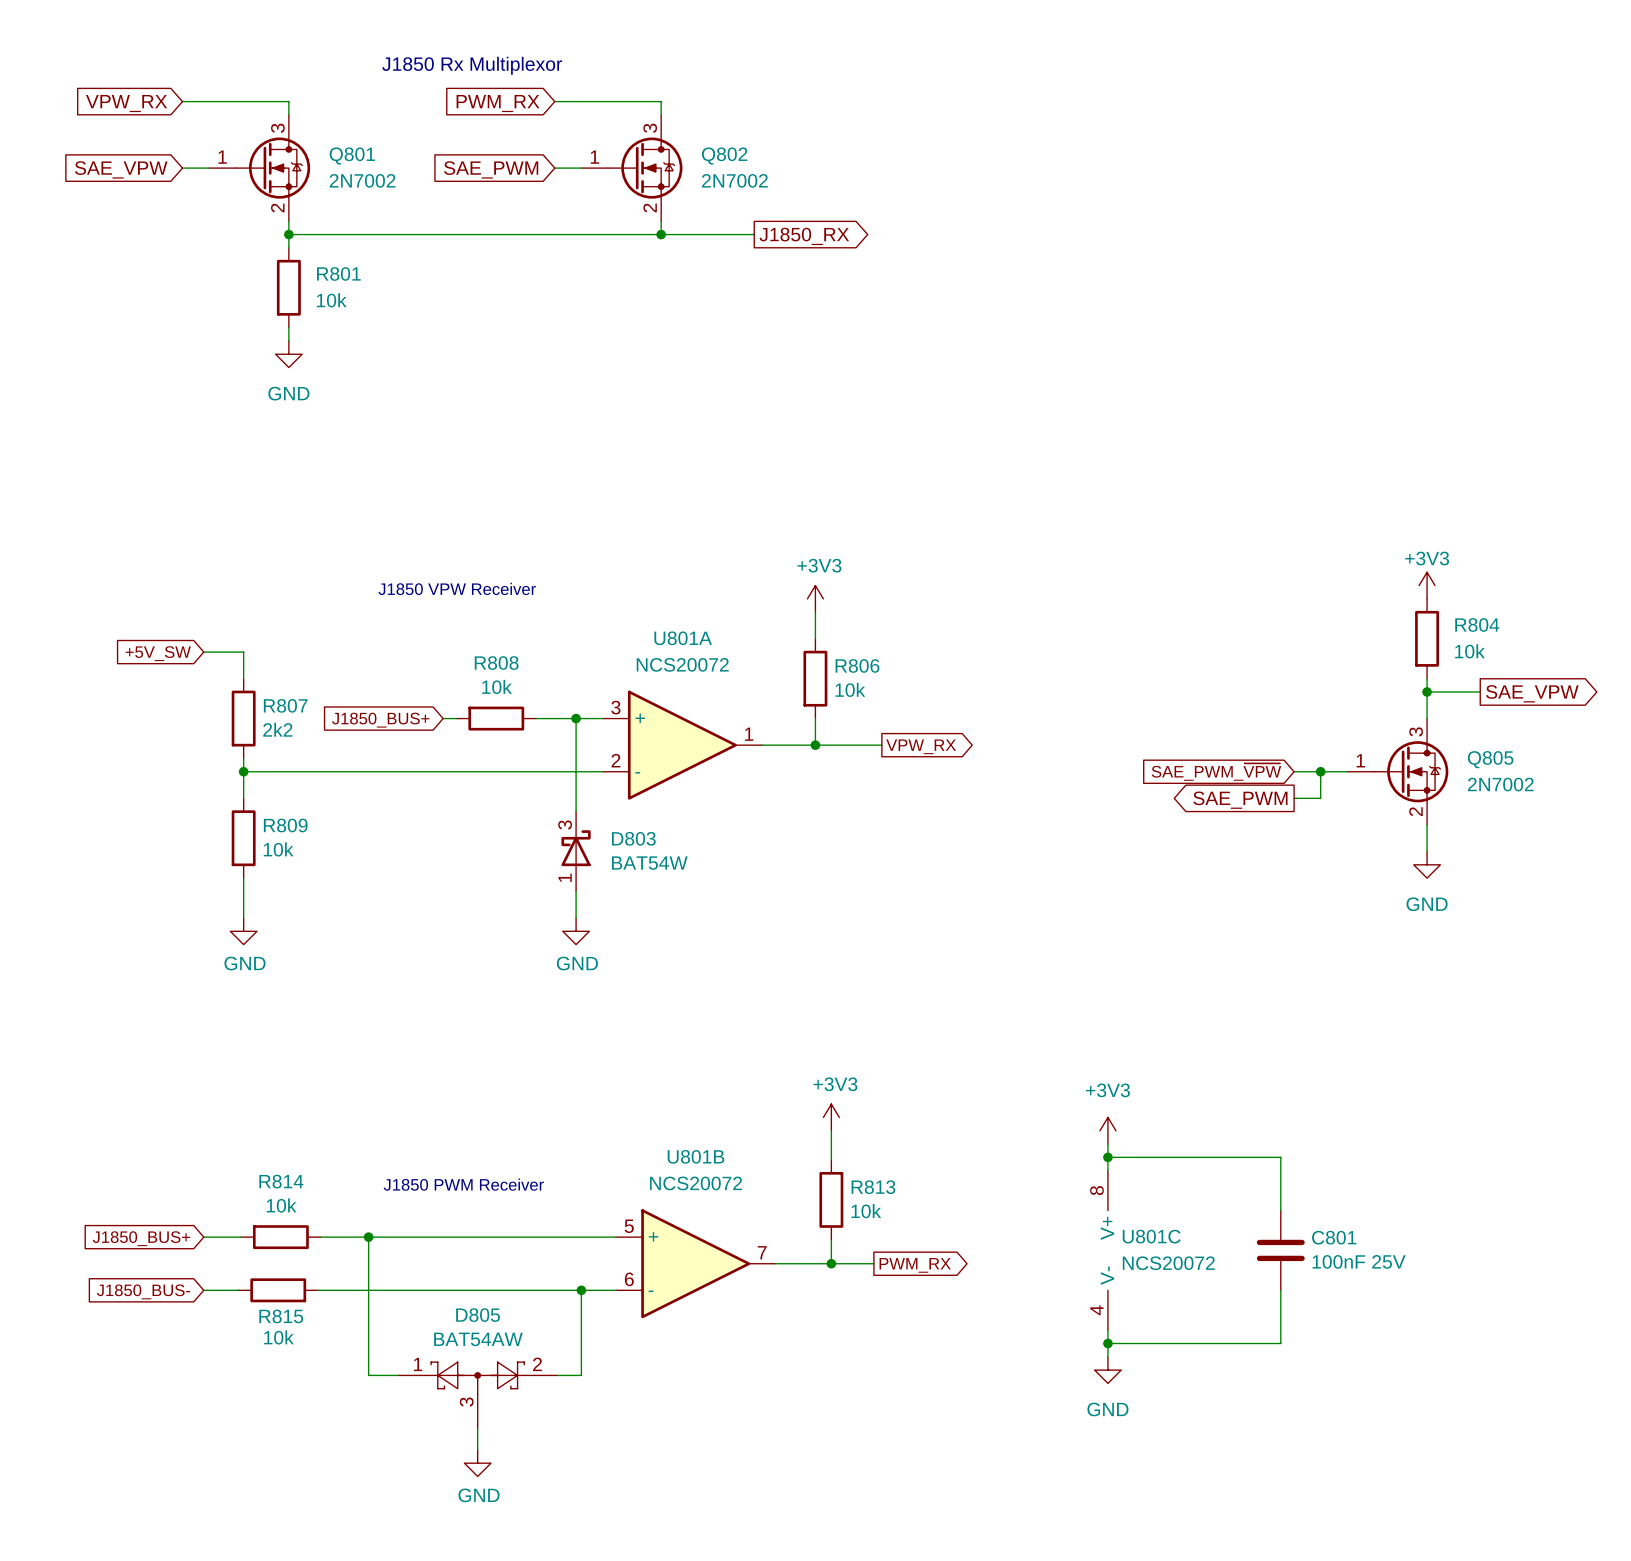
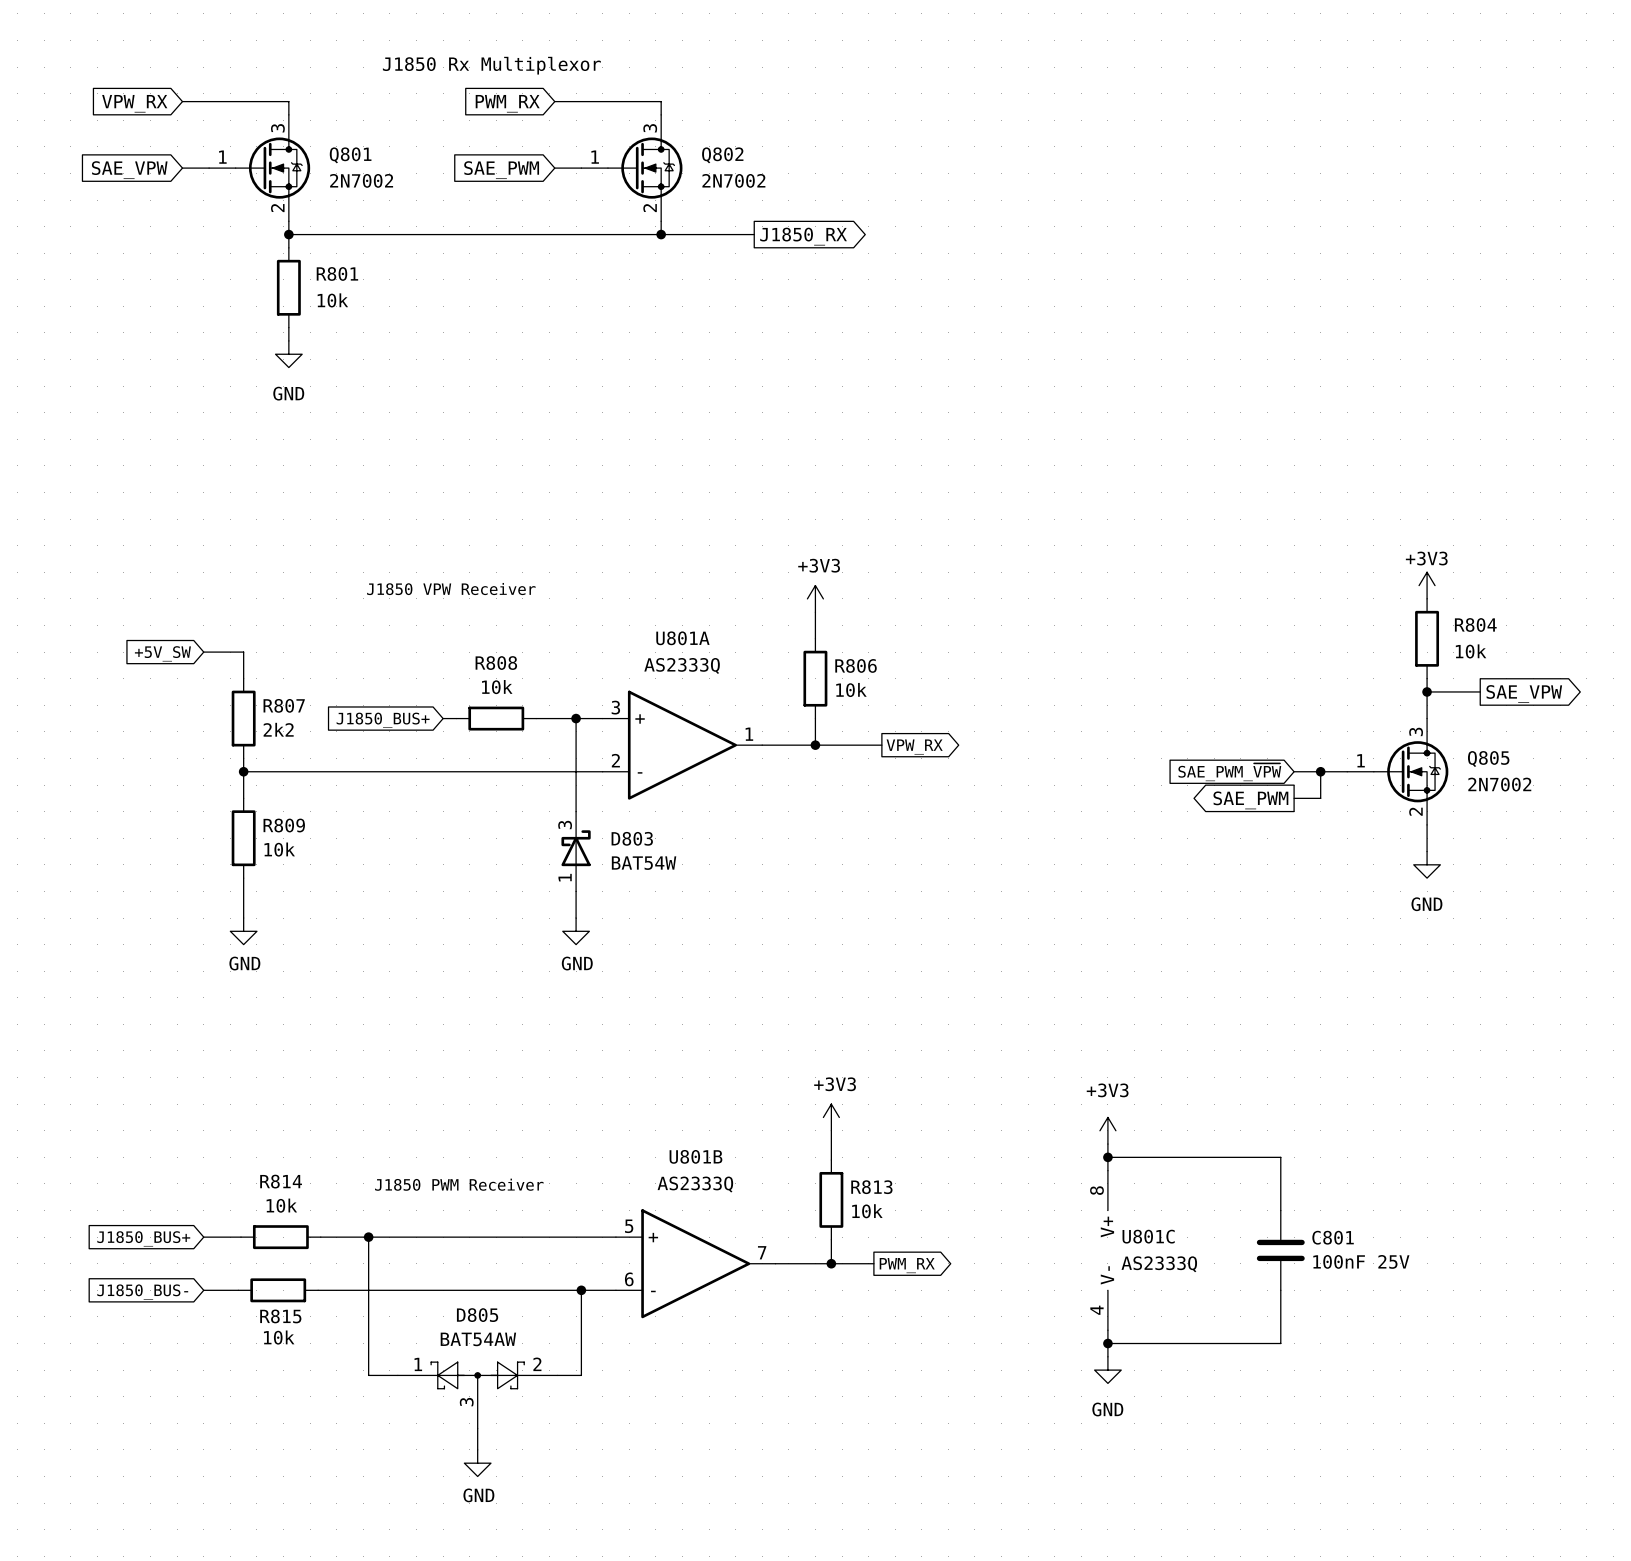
U801A value: NCS20072 (682, 664) -> AS2333Q (682, 665)
U801B value: NCS20072 (696, 1183) -> AS2333Q (695, 1184)
U801C value: NCS20072 (1168, 1263) -> AS2333Q (1159, 1264)

